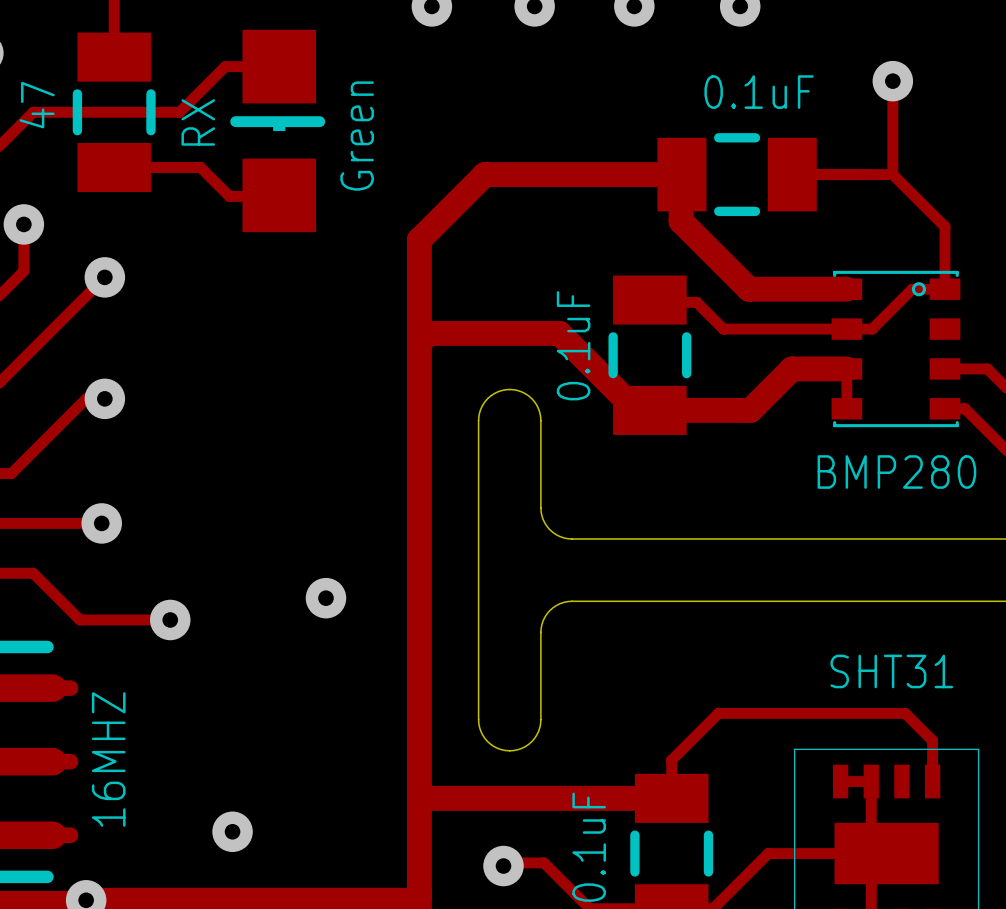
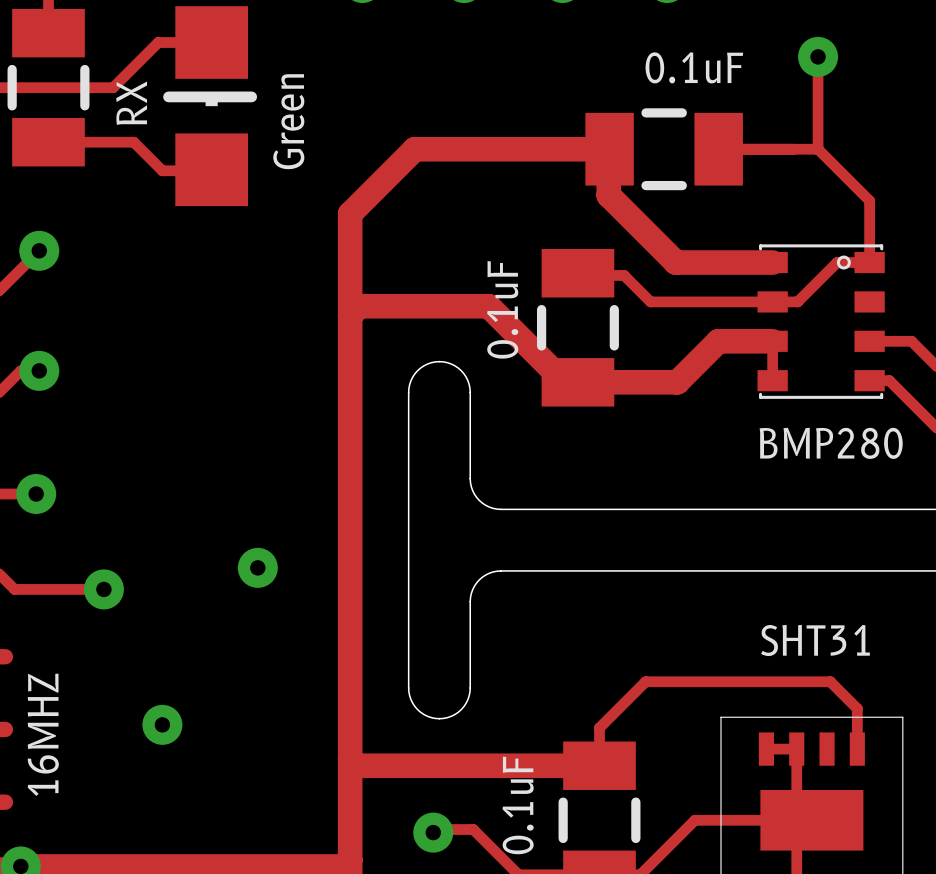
via position: (232, 831) -> (162, 724)

